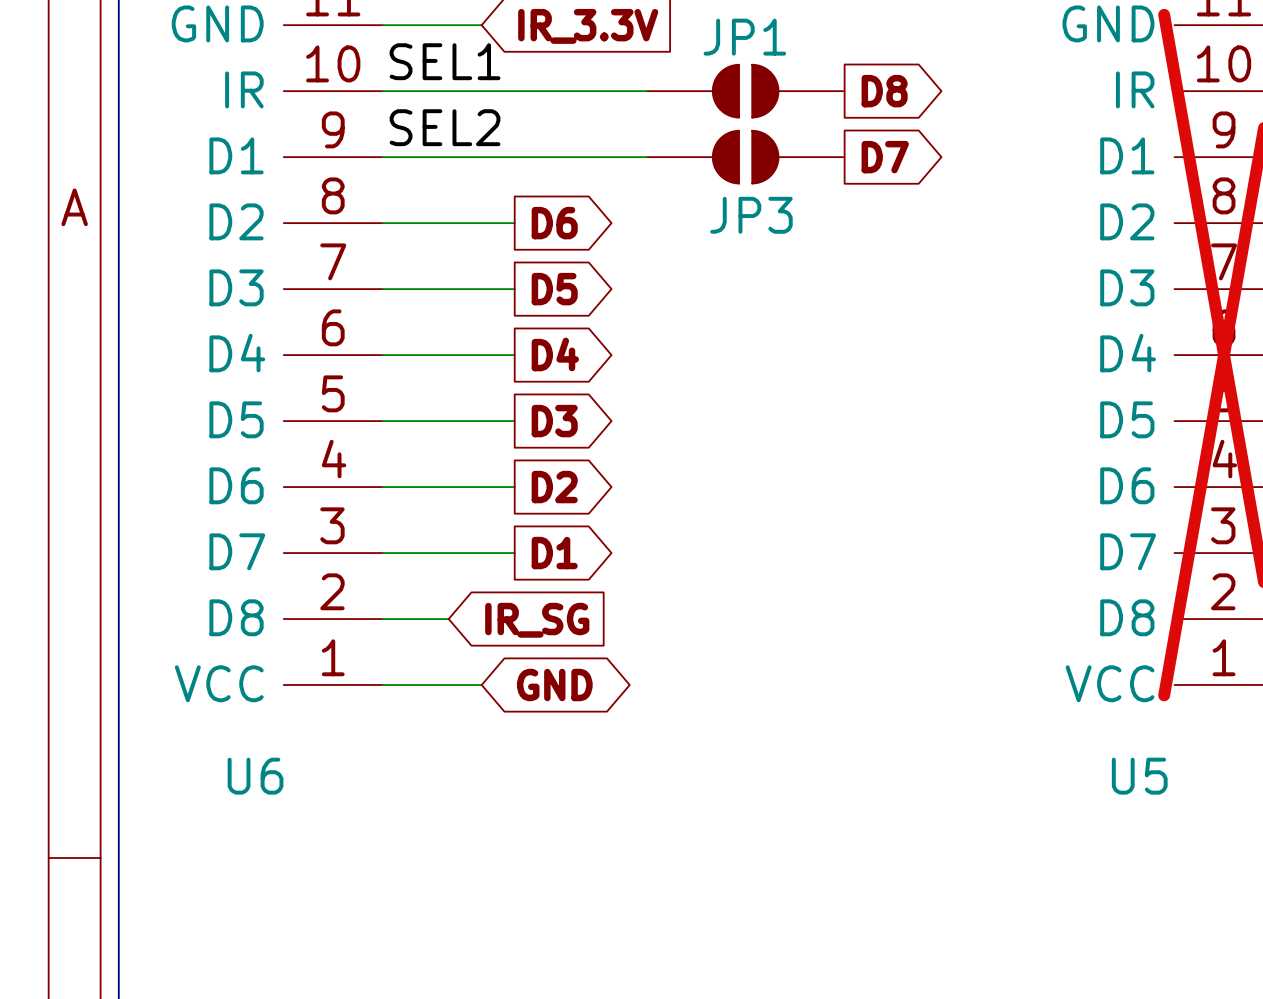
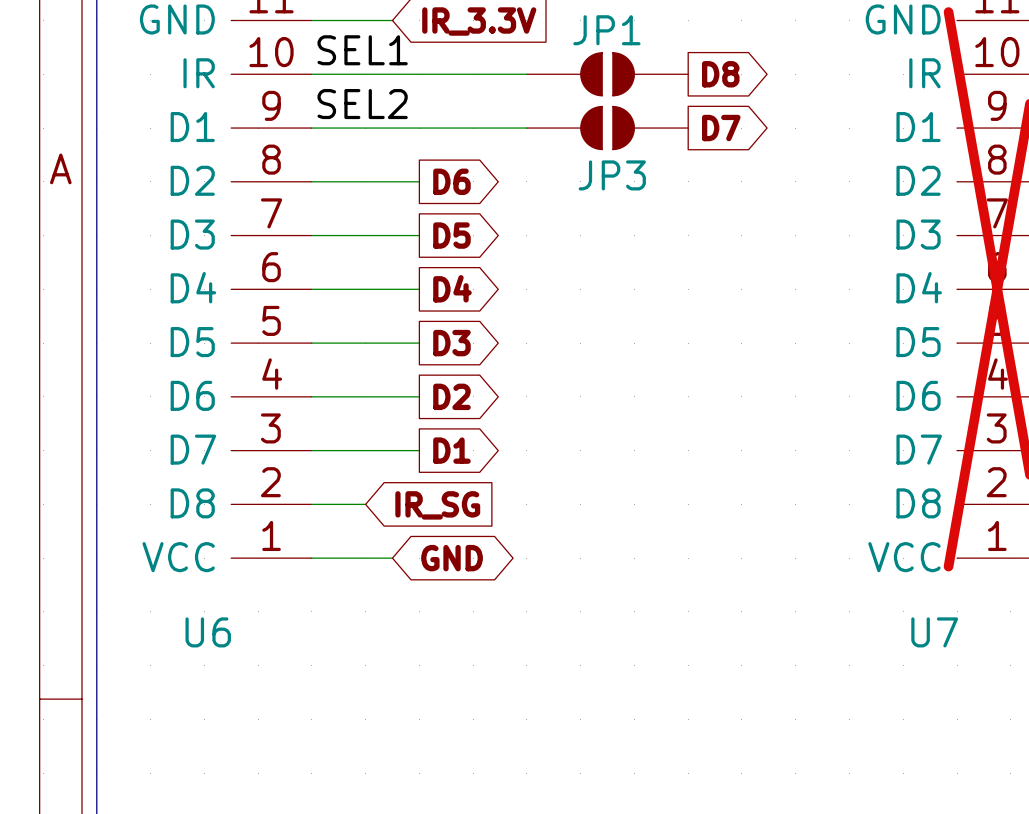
U5 name: U5 (1139, 776) -> U7 (934, 632)

